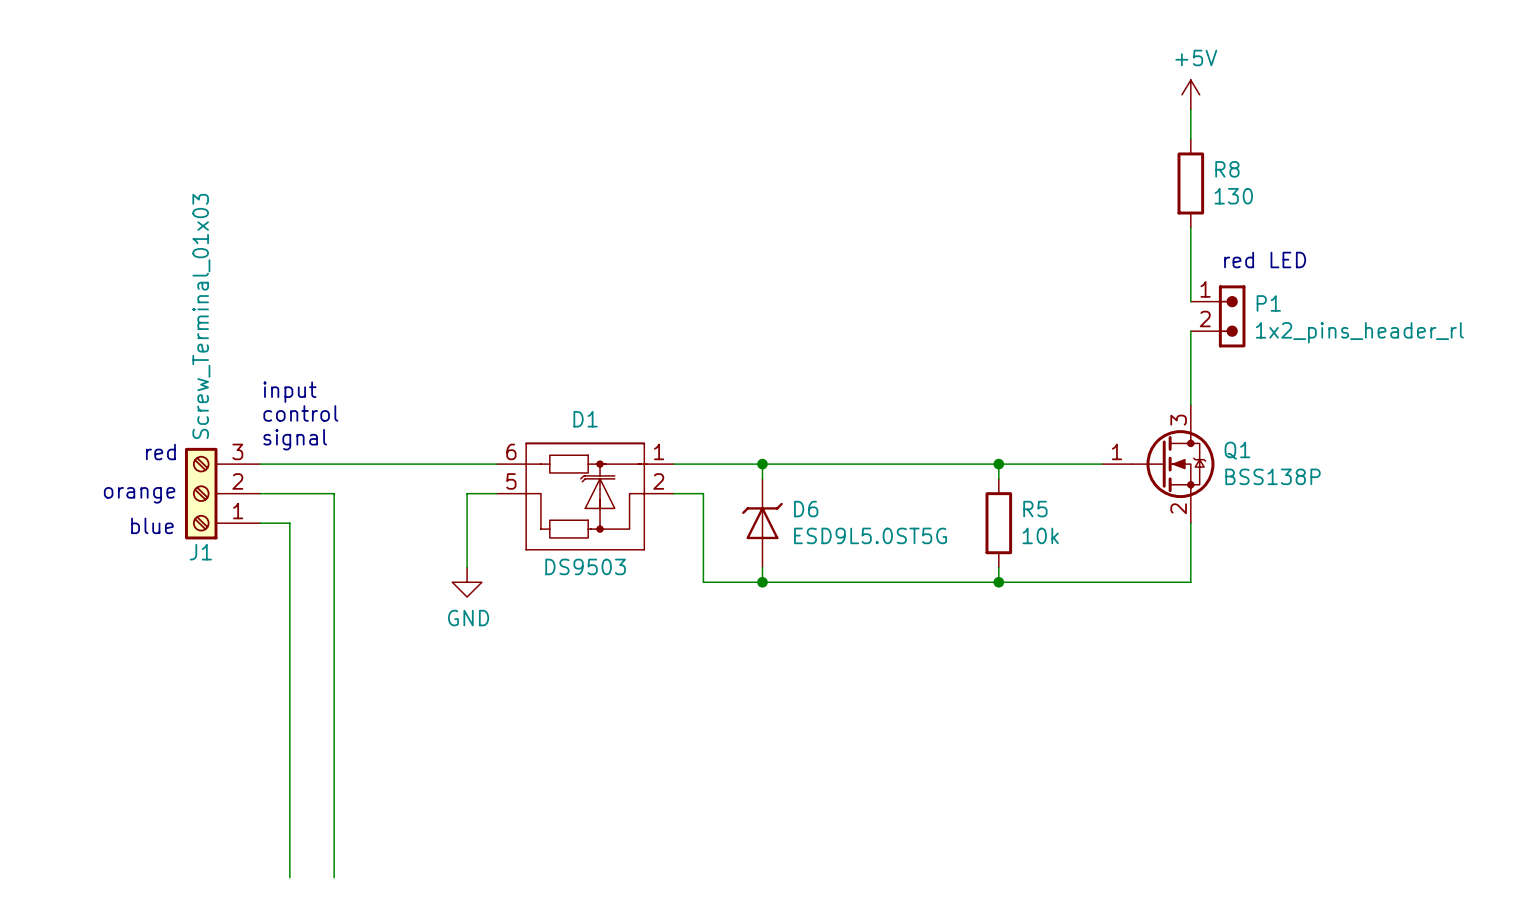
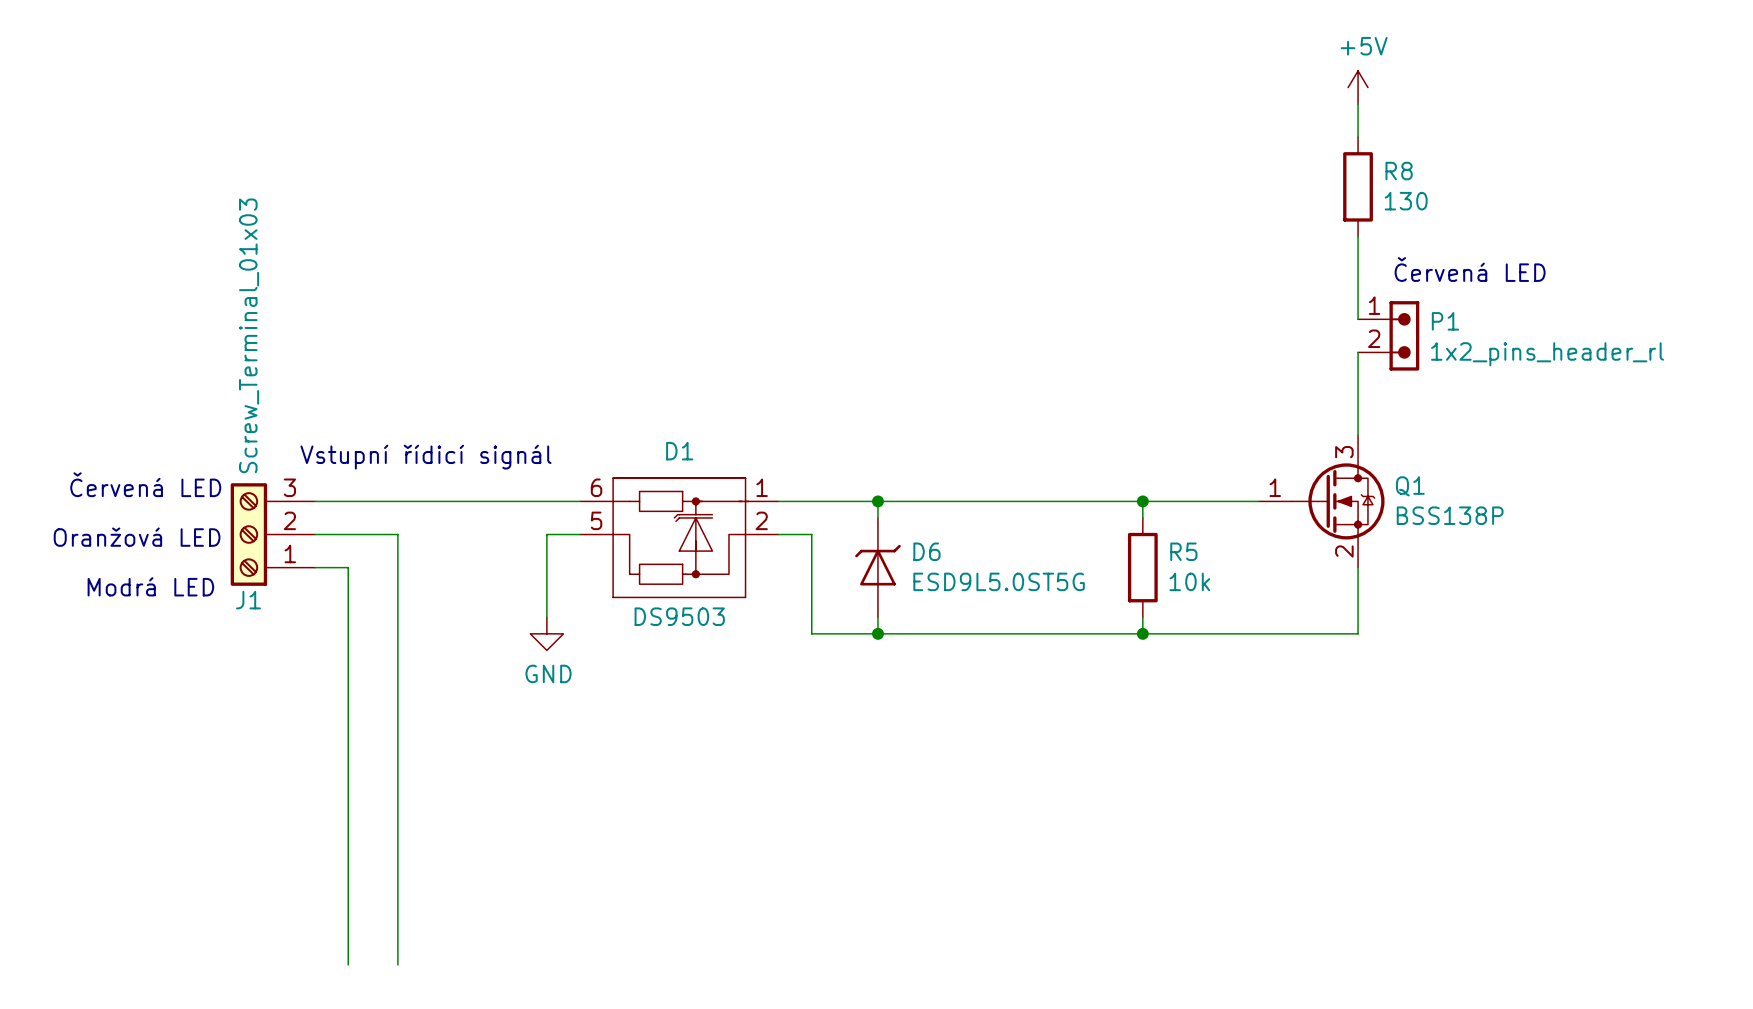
text: red LED (1265, 260) -> Červená LED (1470, 269)
text: input (289, 392) -> none
text: control (300, 413) -> none
text: none -> Vstupní řídicí signál (426, 457)
text: signal (295, 439) -> none
text: none -> Červená LED (145, 484)
text: red (160, 452) -> none
text: none -> Oranžová LED (137, 537)
text: orange (139, 495) -> none
text: blue (152, 525) -> none
text: none -> Modrá LED (150, 586)

